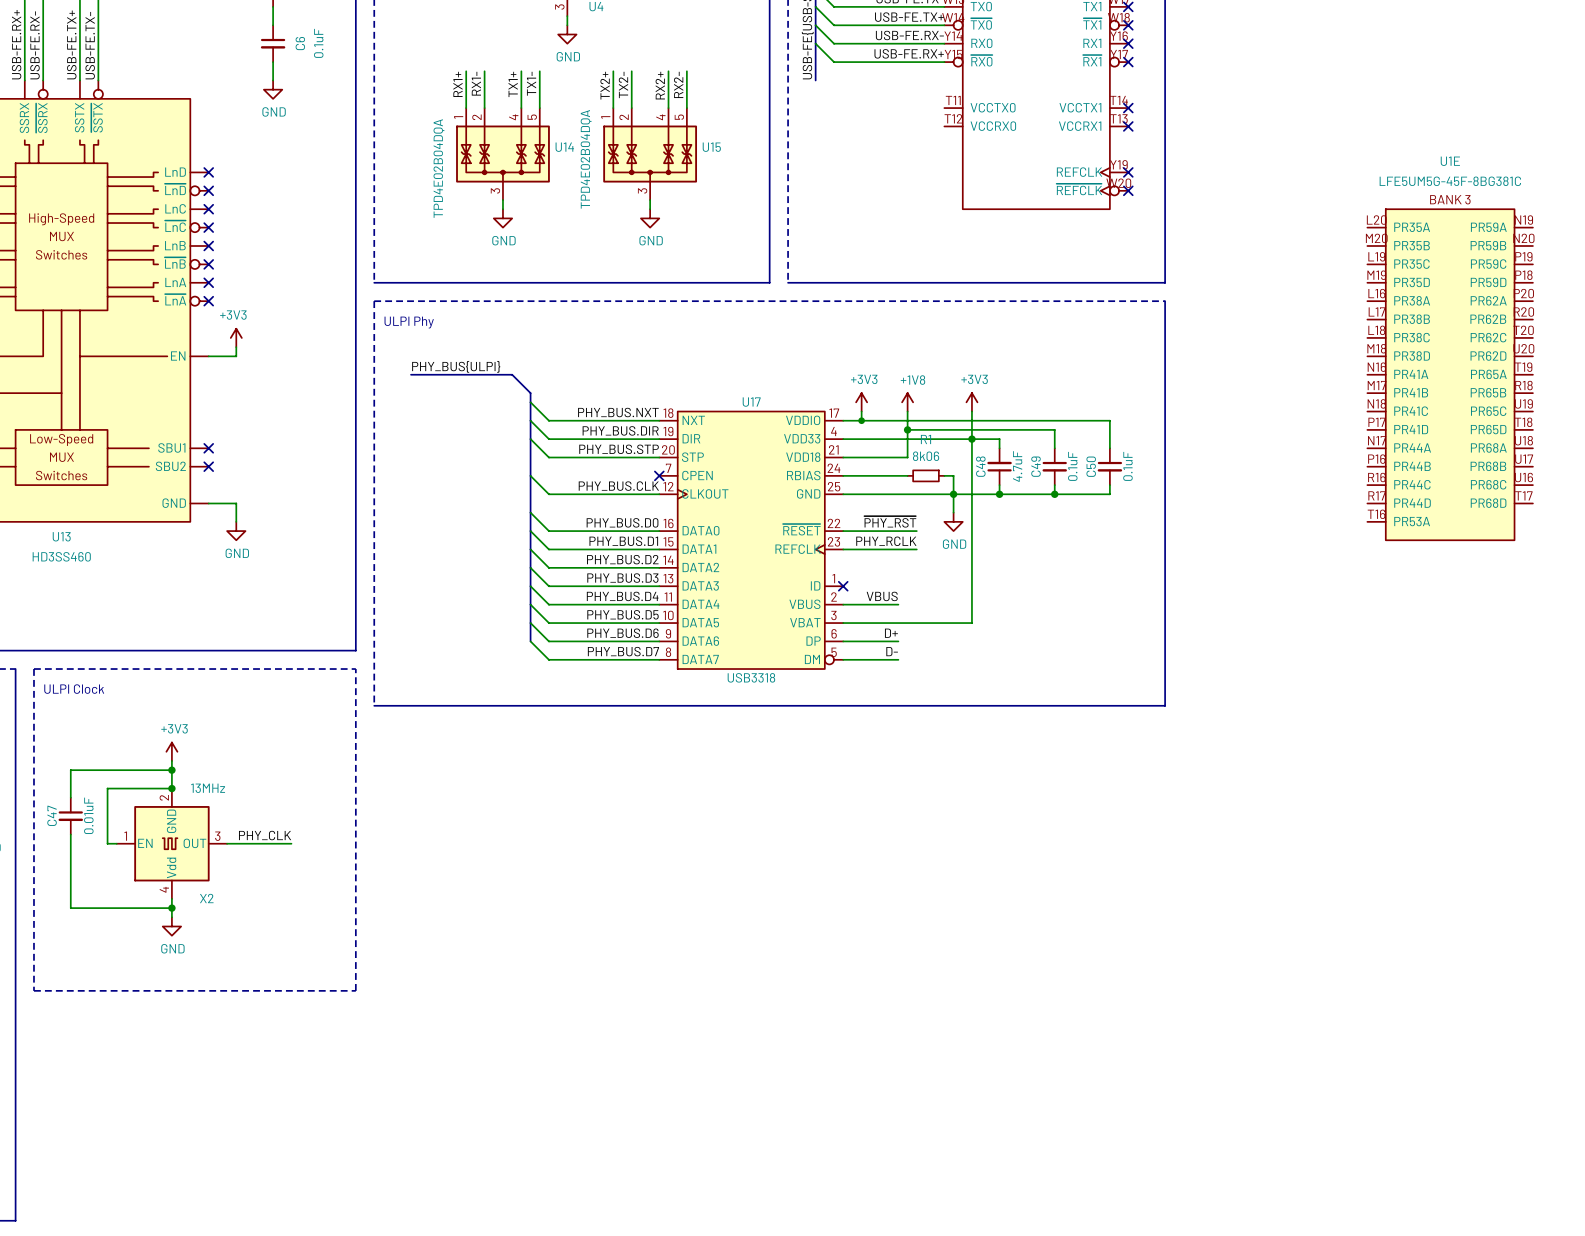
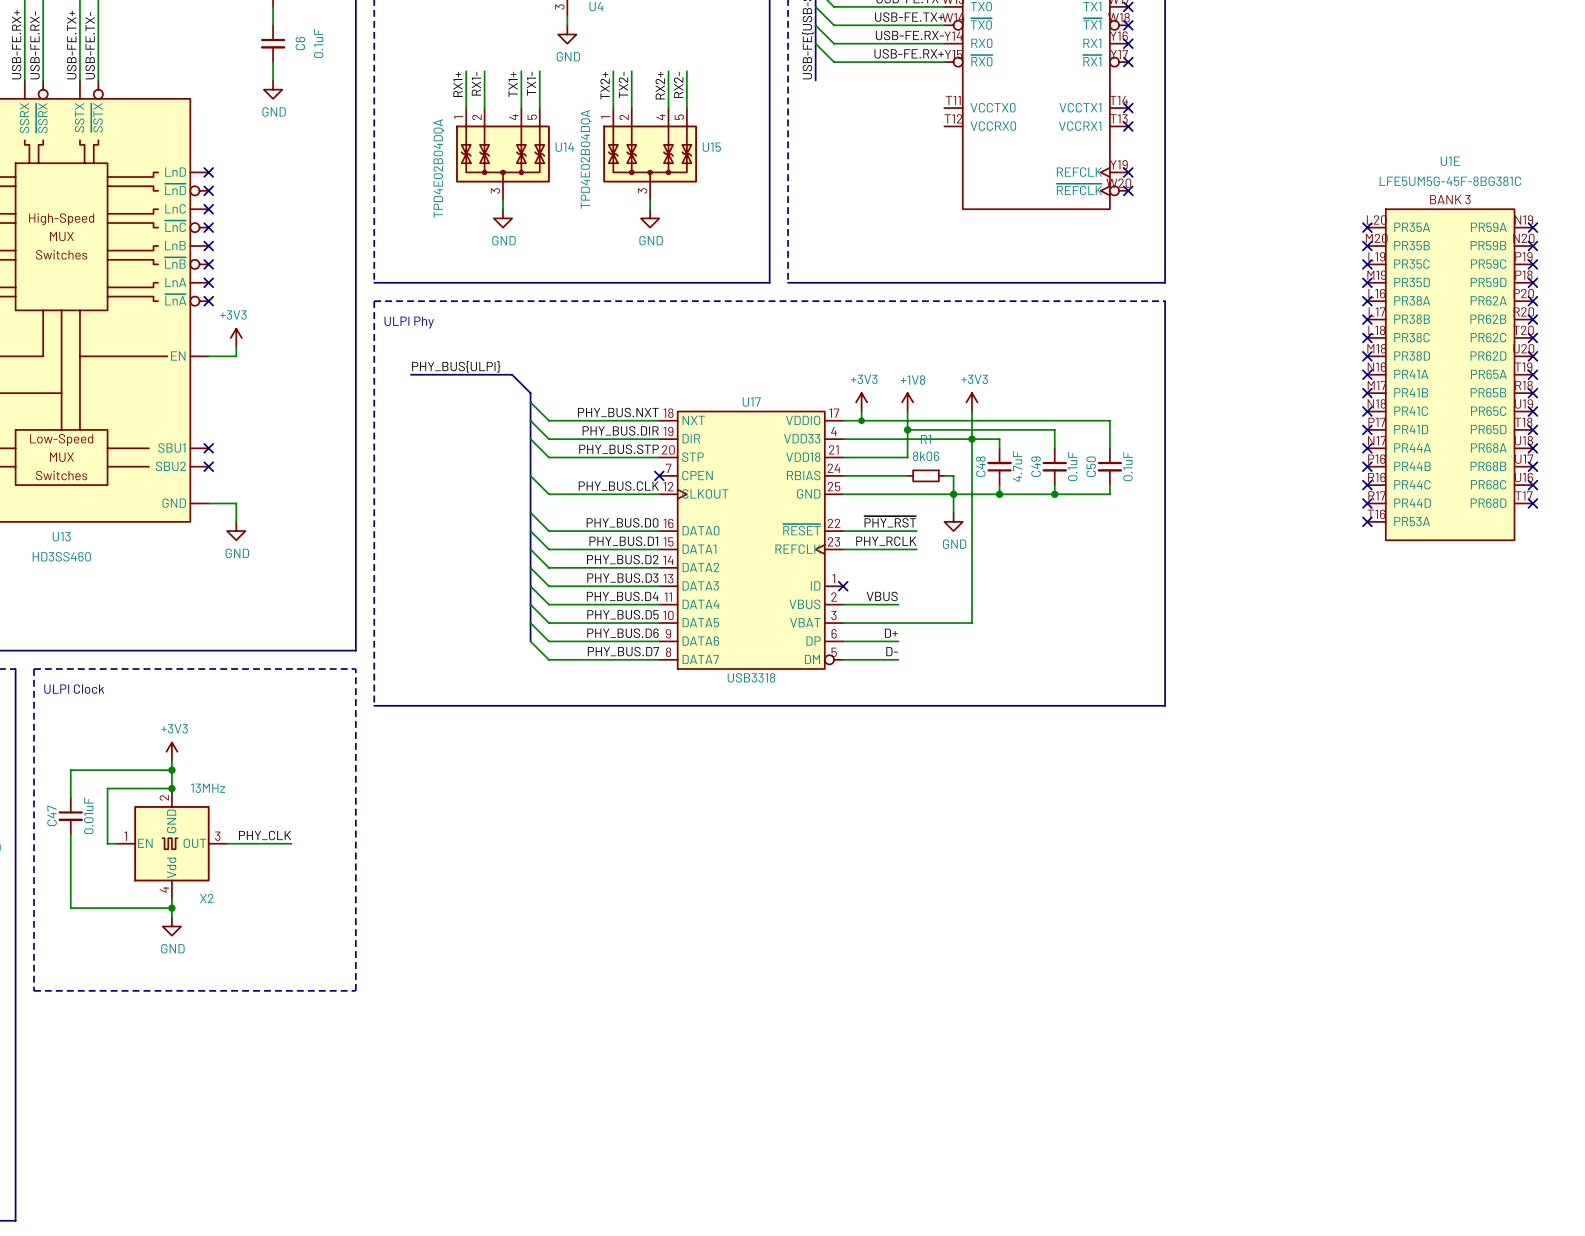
no-connect mark: none -> (1367, 227)
no-connect mark: none -> (1532, 227)
no-connect mark: none -> (1367, 246)
no-connect mark: none -> (1532, 246)
no-connect mark: none -> (1367, 264)
no-connect mark: none -> (1532, 264)
no-connect mark: none -> (1367, 282)
no-connect mark: none -> (1532, 282)
no-connect mark: none -> (1367, 301)
no-connect mark: none -> (1532, 301)
no-connect mark: none -> (1367, 319)
no-connect mark: none -> (1532, 319)
no-connect mark: none -> (1367, 337)
no-connect mark: none -> (1532, 337)
no-connect mark: none -> (1367, 356)
no-connect mark: none -> (1532, 356)
no-connect mark: none -> (1367, 374)
no-connect mark: none -> (1532, 374)
no-connect mark: none -> (1367, 393)
no-connect mark: none -> (1532, 393)
no-connect mark: none -> (1367, 411)
no-connect mark: none -> (1532, 411)
no-connect mark: none -> (1367, 429)
no-connect mark: none -> (1532, 429)
no-connect mark: none -> (1367, 448)
no-connect mark: none -> (1532, 448)
no-connect mark: none -> (1367, 466)
no-connect mark: none -> (1532, 466)
no-connect mark: none -> (1367, 485)
no-connect mark: none -> (1532, 485)
no-connect mark: none -> (1367, 503)
no-connect mark: none -> (1532, 503)
no-connect mark: none -> (1367, 521)

